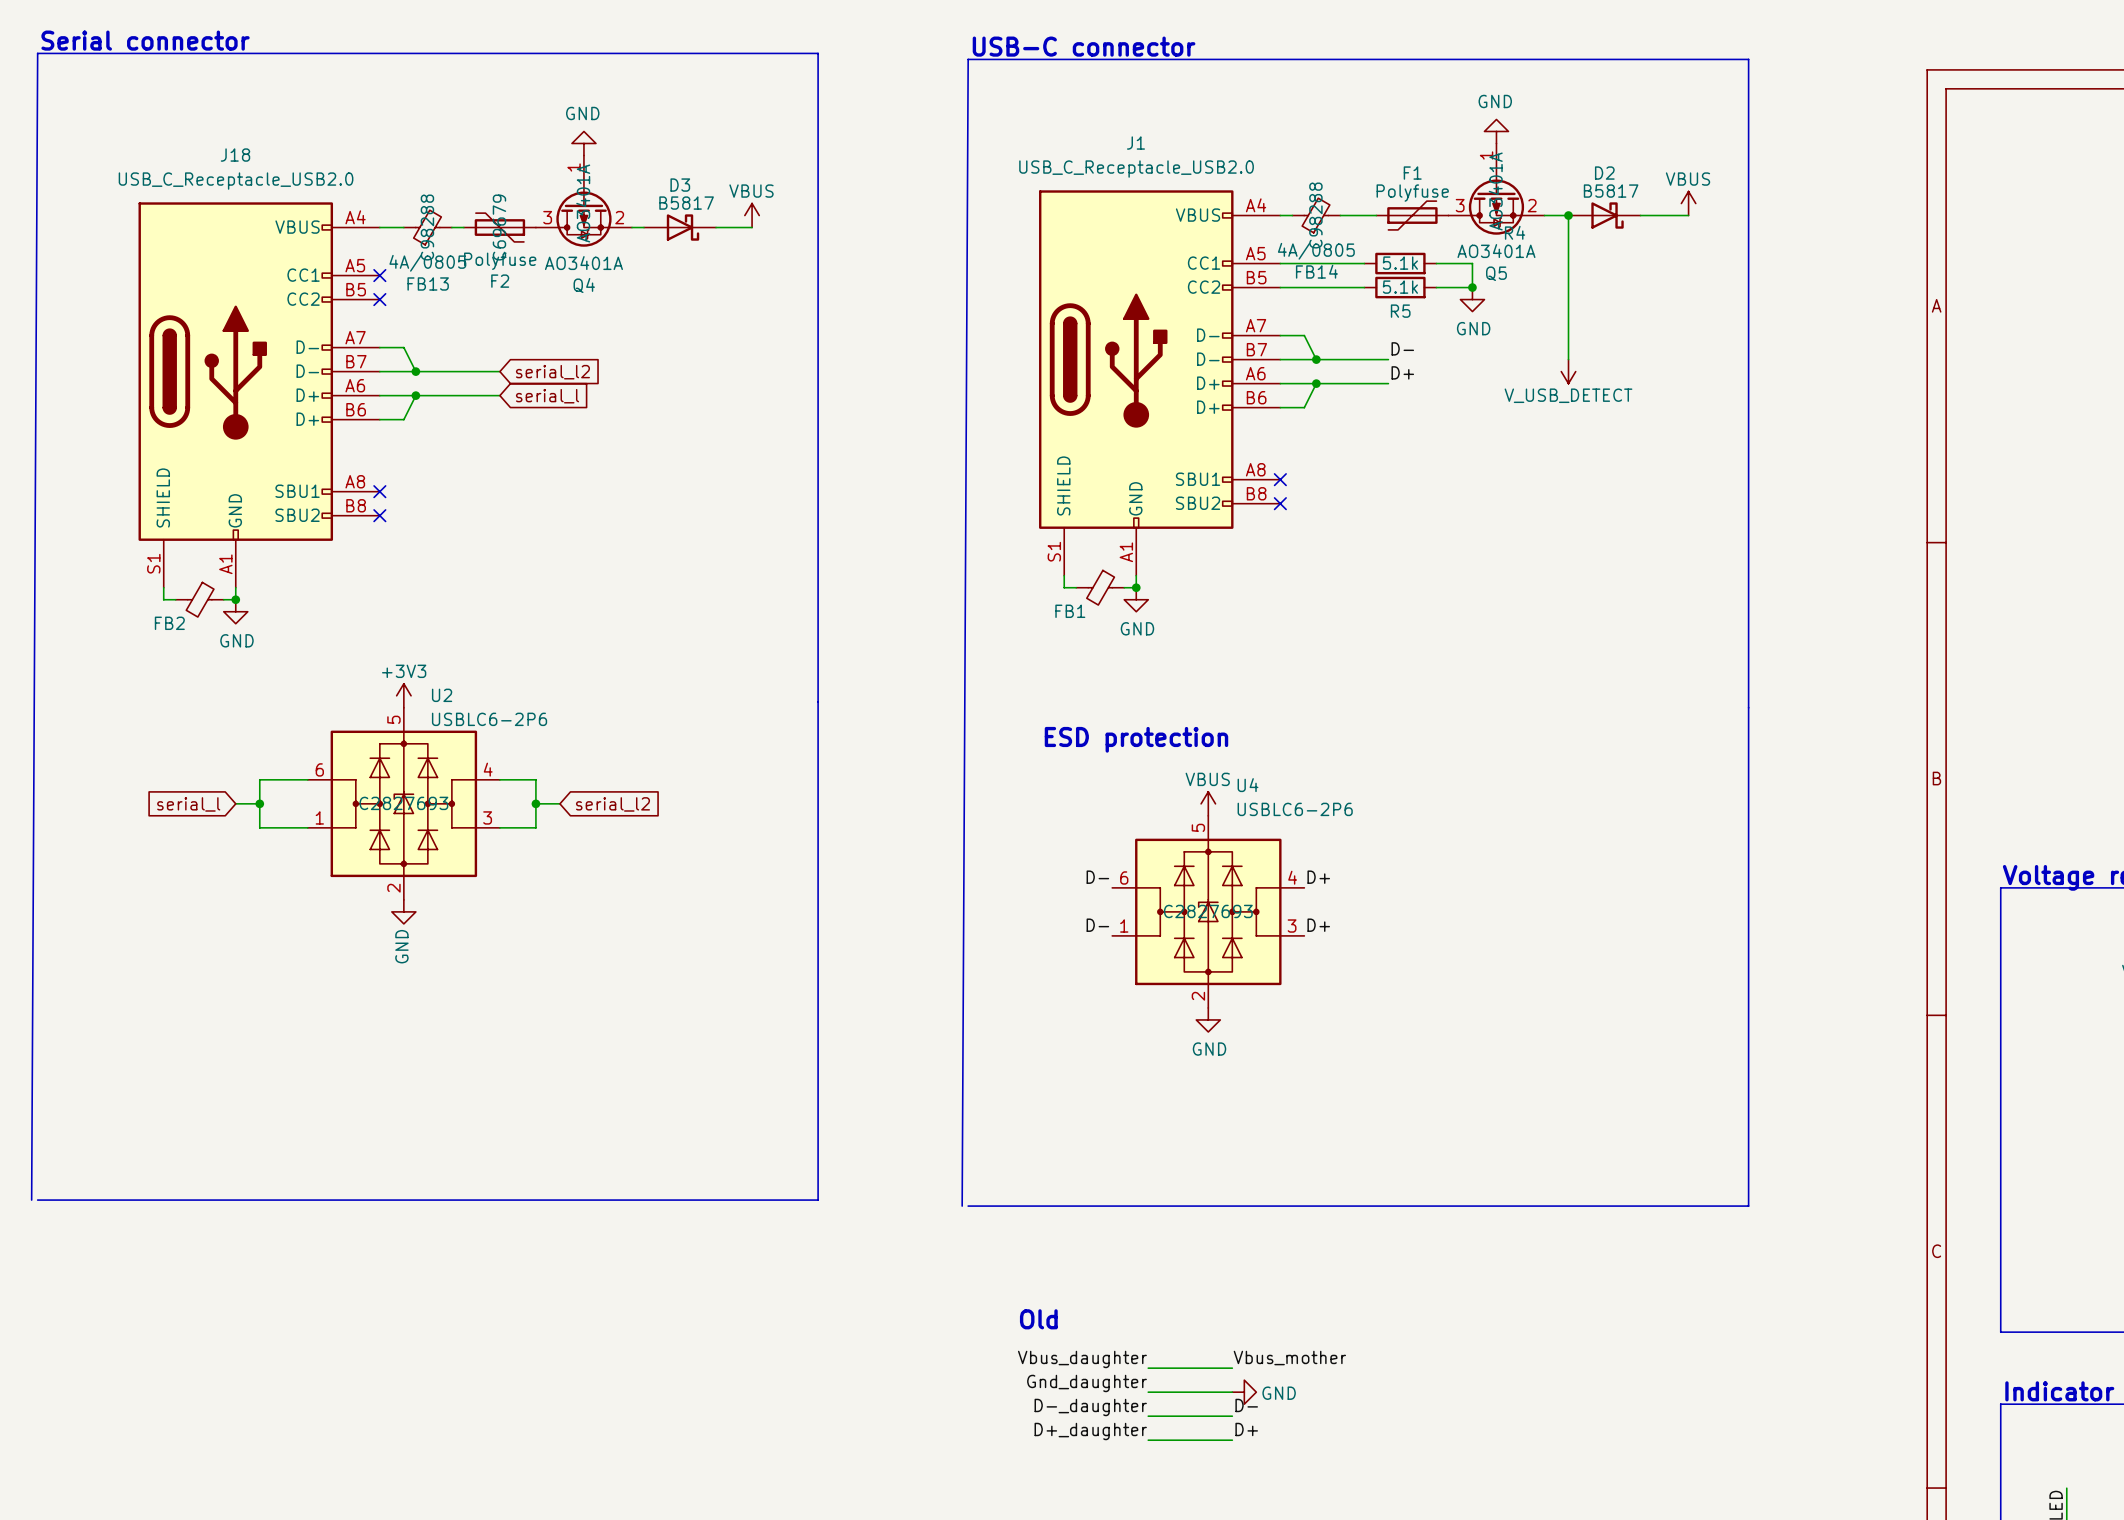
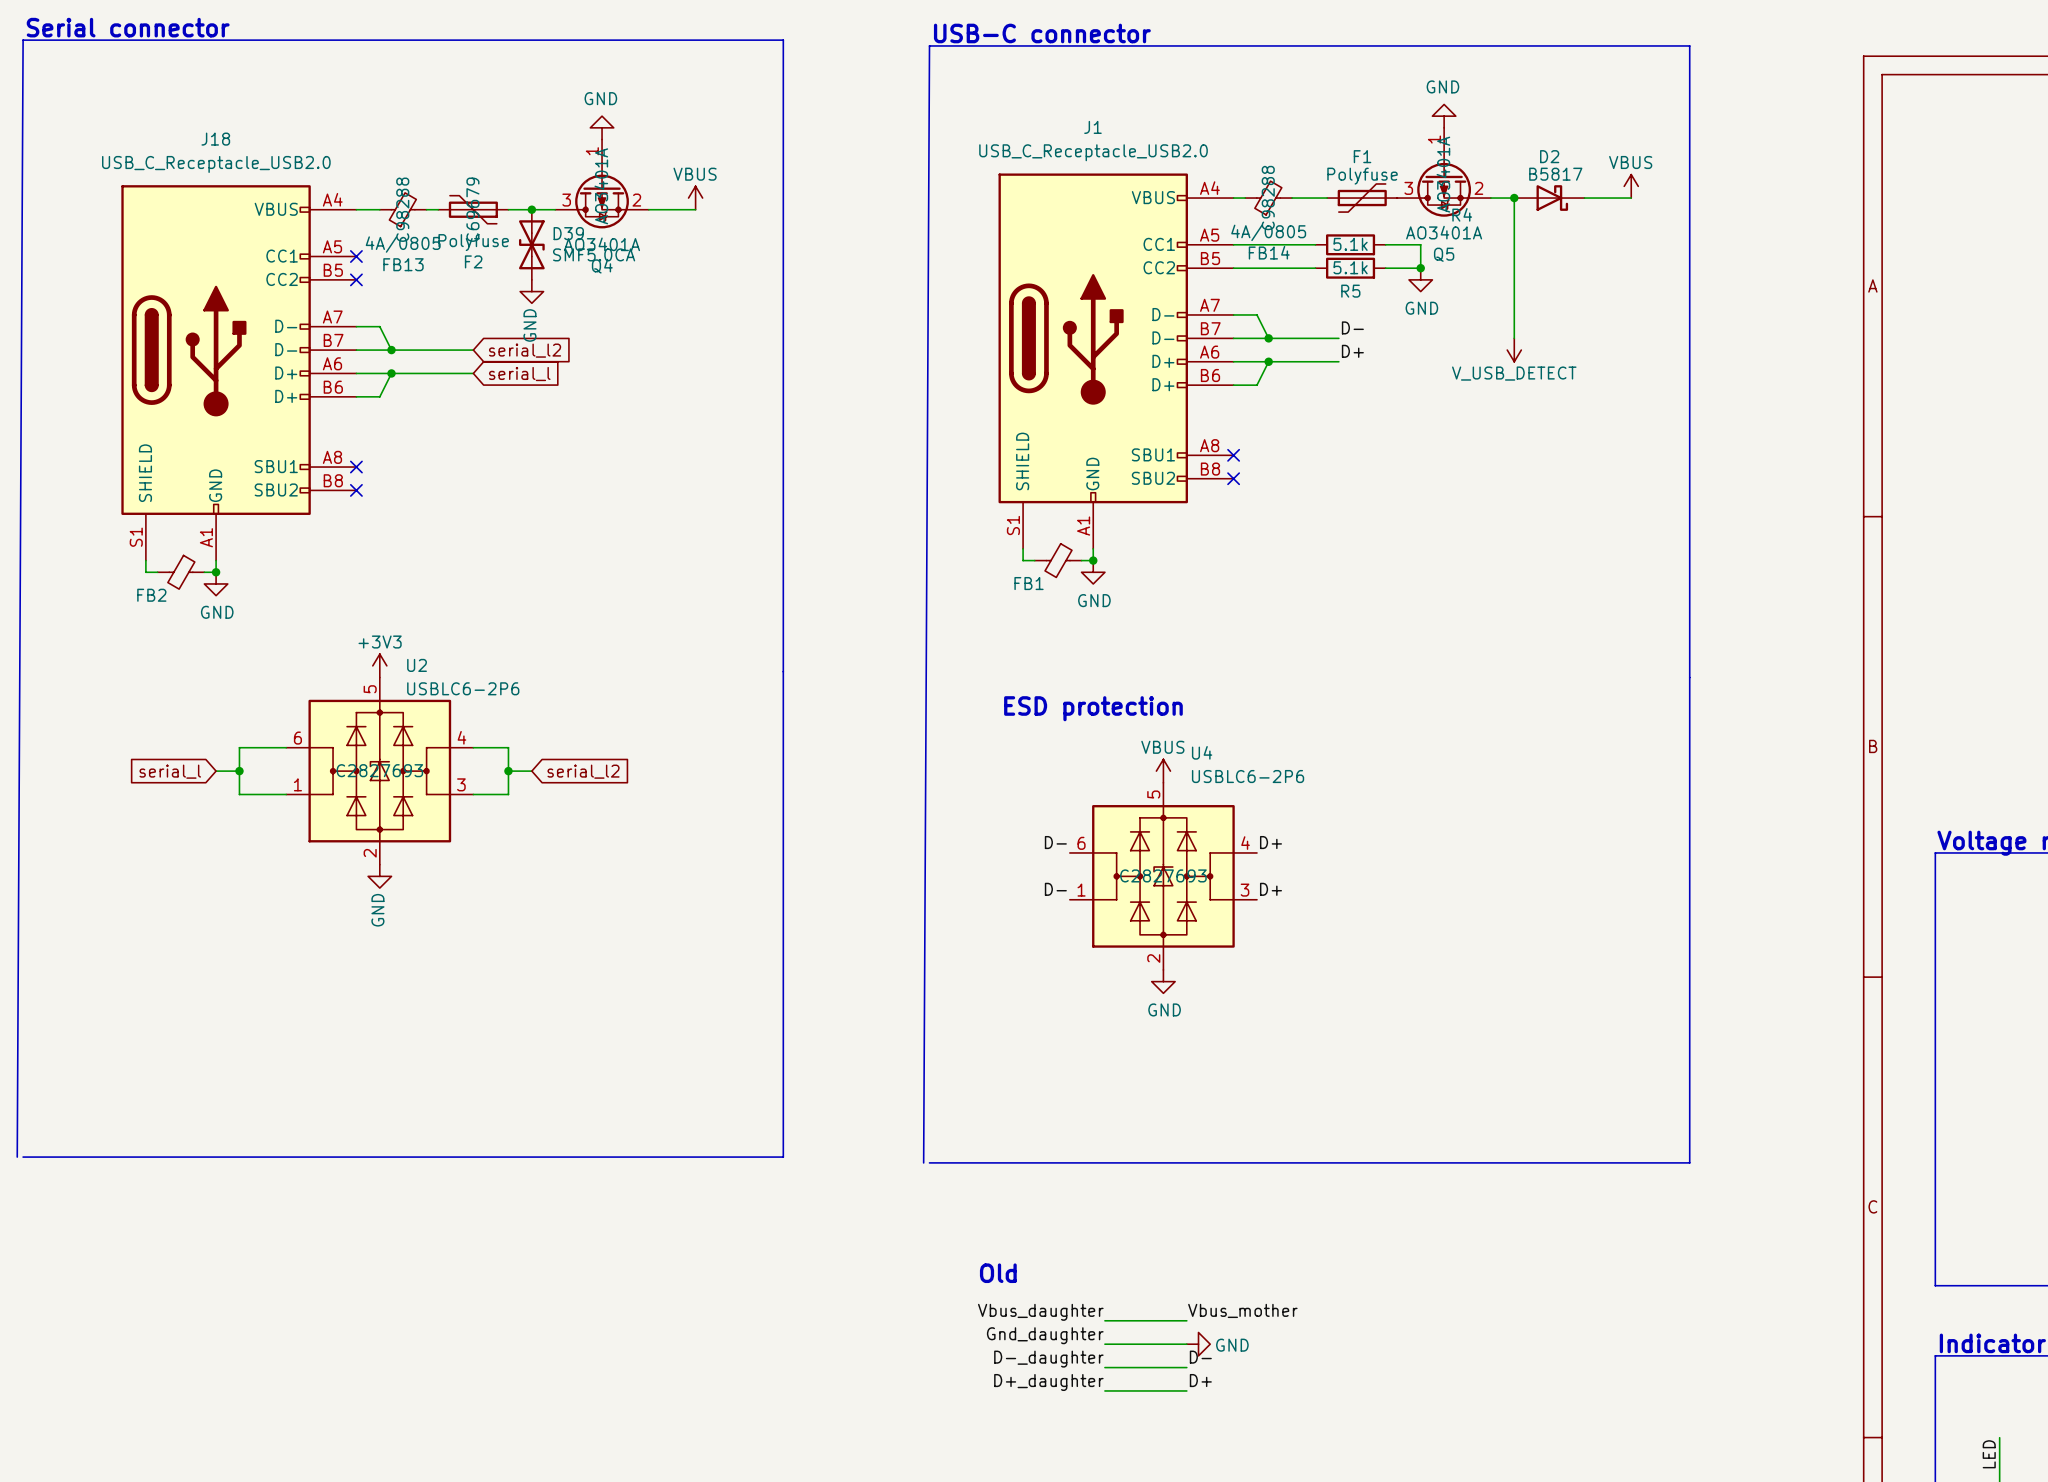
power symbol position: GND (583, 143) -> GND (602, 127)
Q4 position: (583, 201) -> (602, 183)
power symbol position: VBUS (752, 215) -> VBUS (695, 198)
junction: none -> (531, 209)
D3: B5817 (680, 227) -> none
wire: (728, 227) (752, 227) -> none
D39: none -> SMF5.0CA (531, 244)
power symbol: none -> GND (531, 291)

